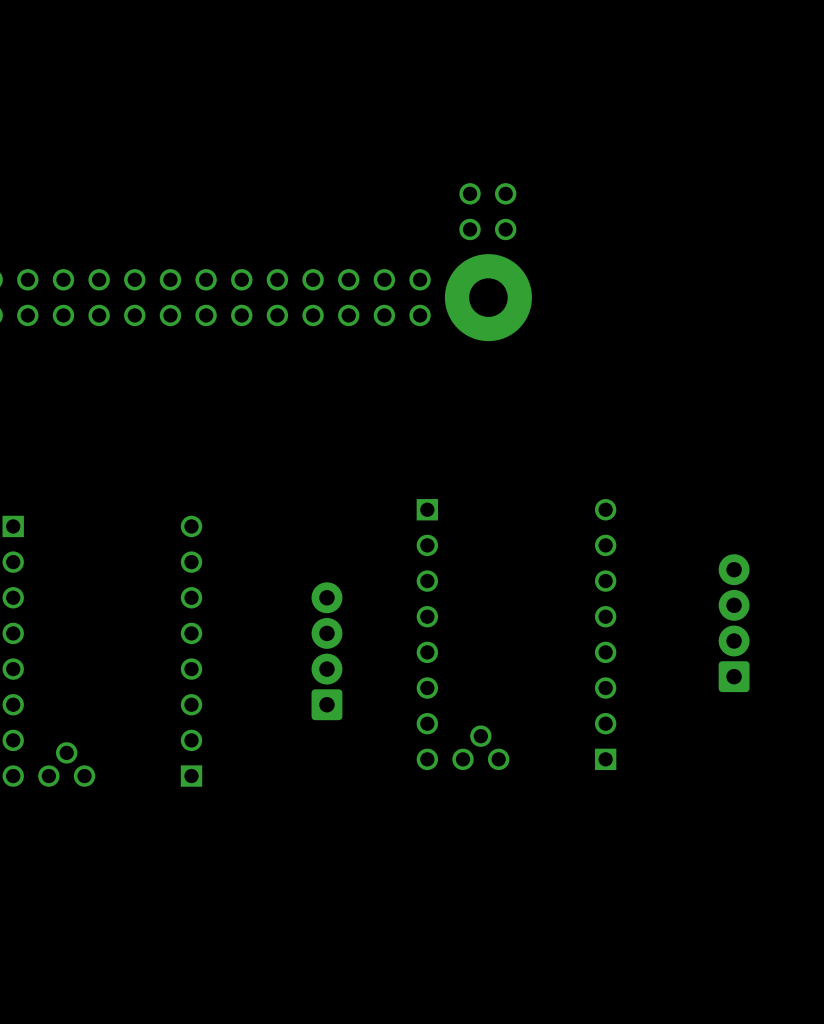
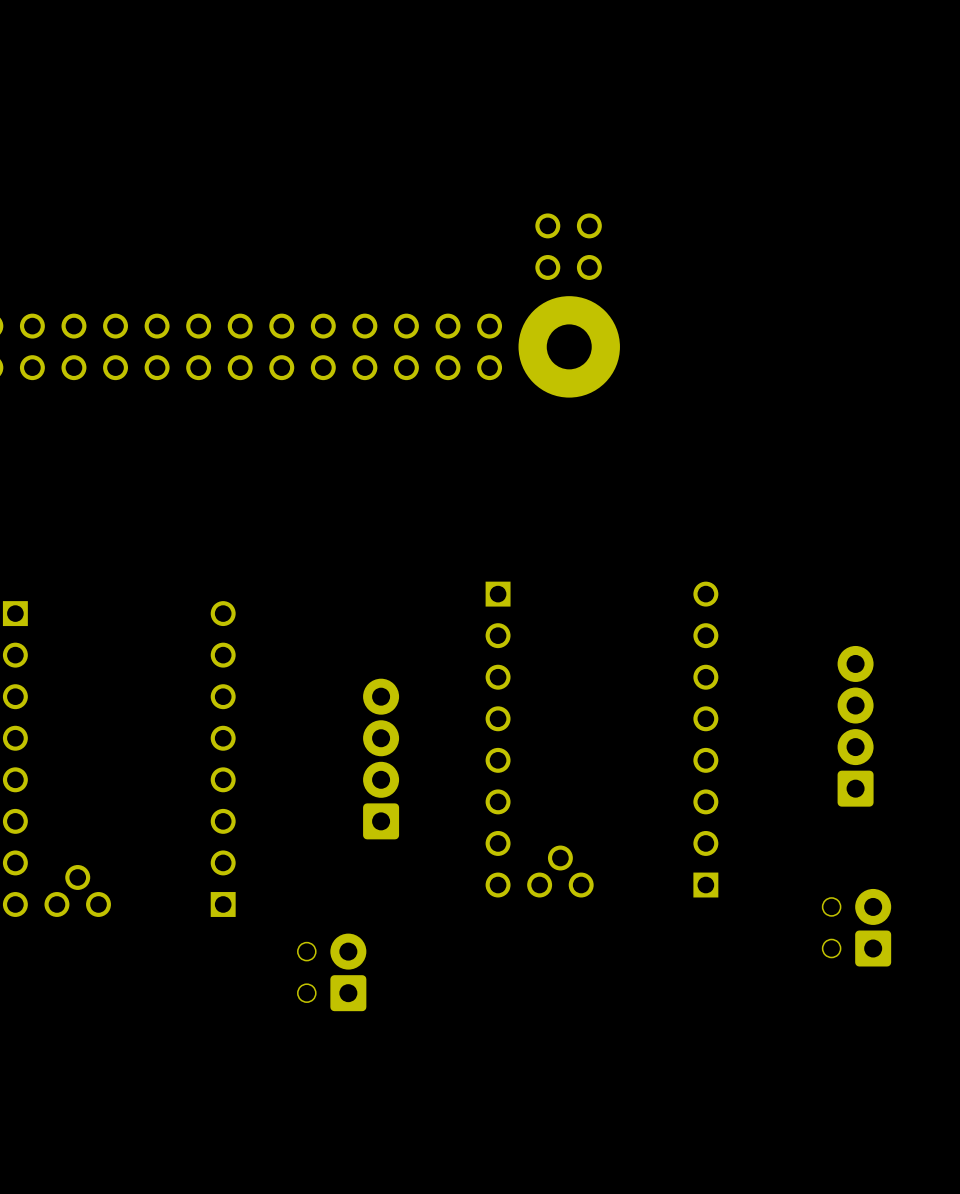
part: none -> (856, 927)
part: none -> (332, 972)

